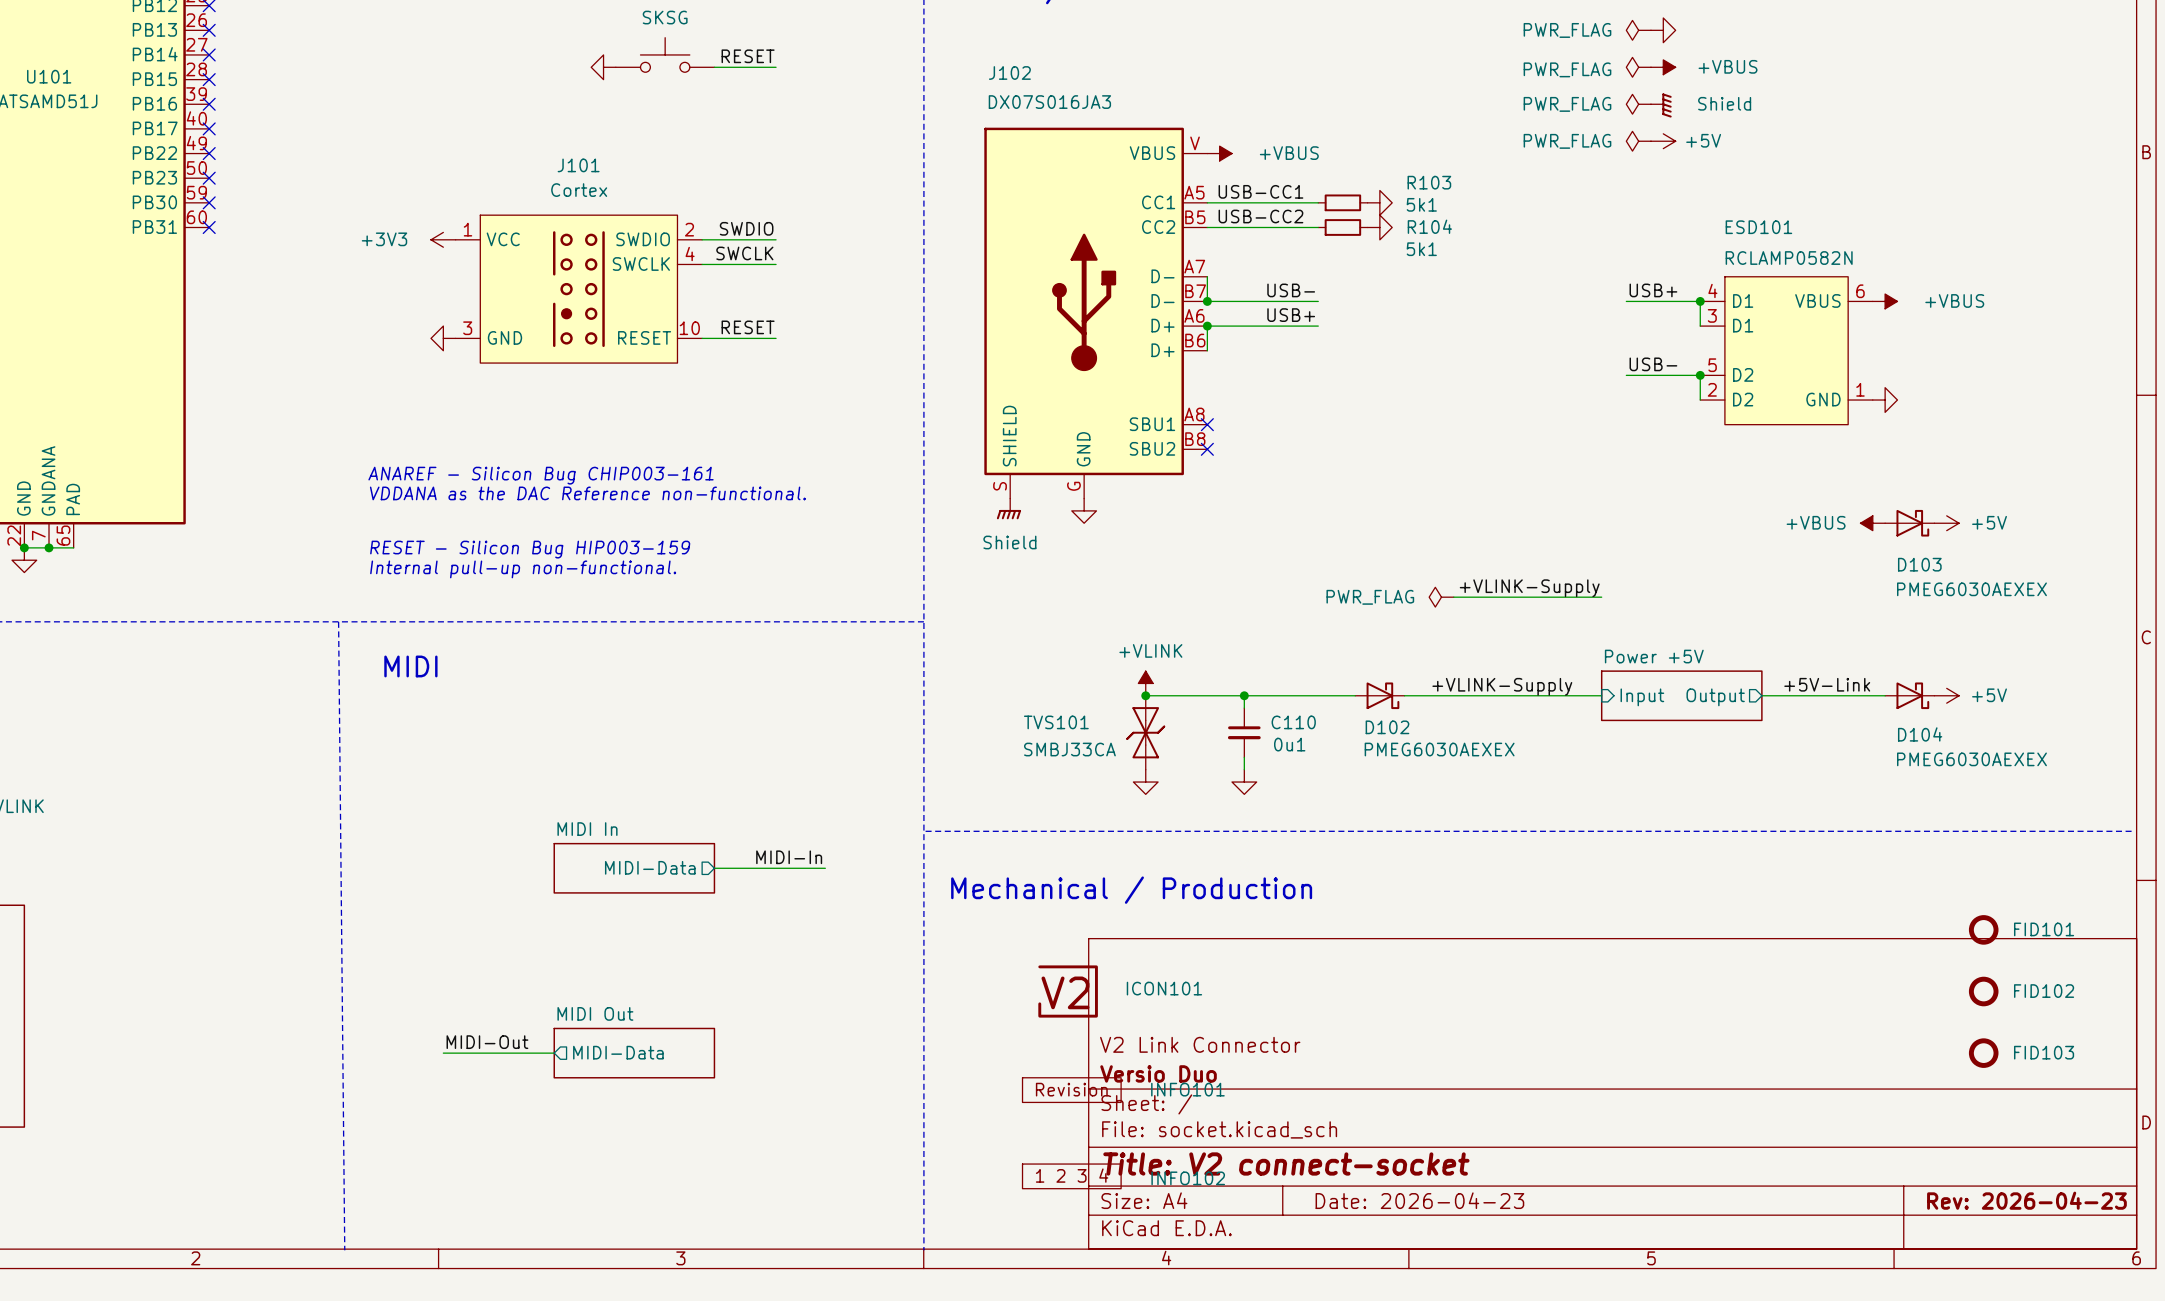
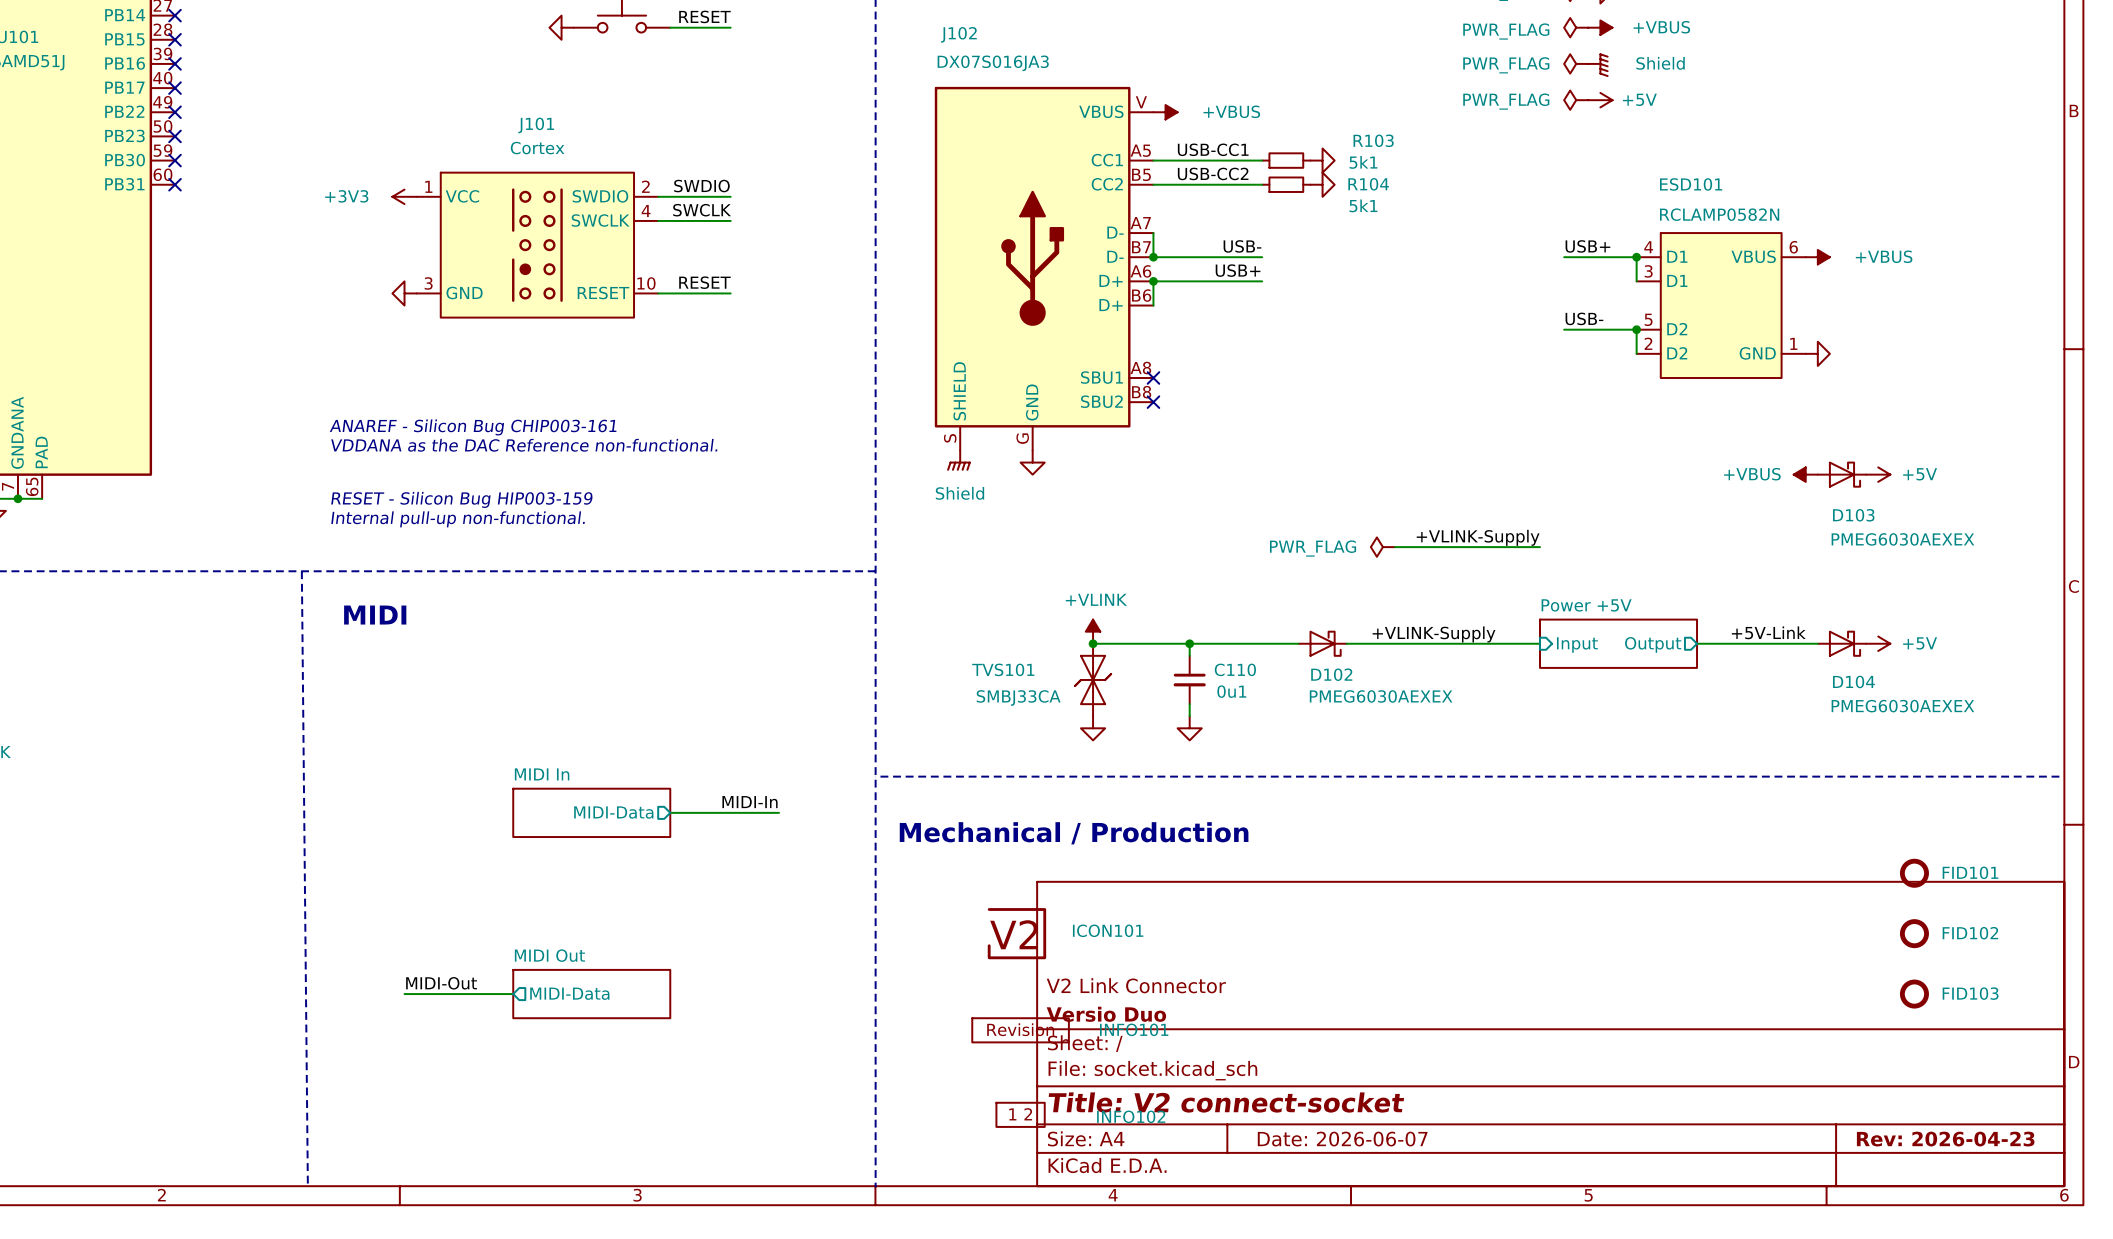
INFO102 symbol: [1022, 1164, 1122, 1189] -> [996, 1102, 1045, 1127]
title block: Date: 2026-04-23 (1419, 1200) -> Date: 2026-06-07 (1342, 1139)

